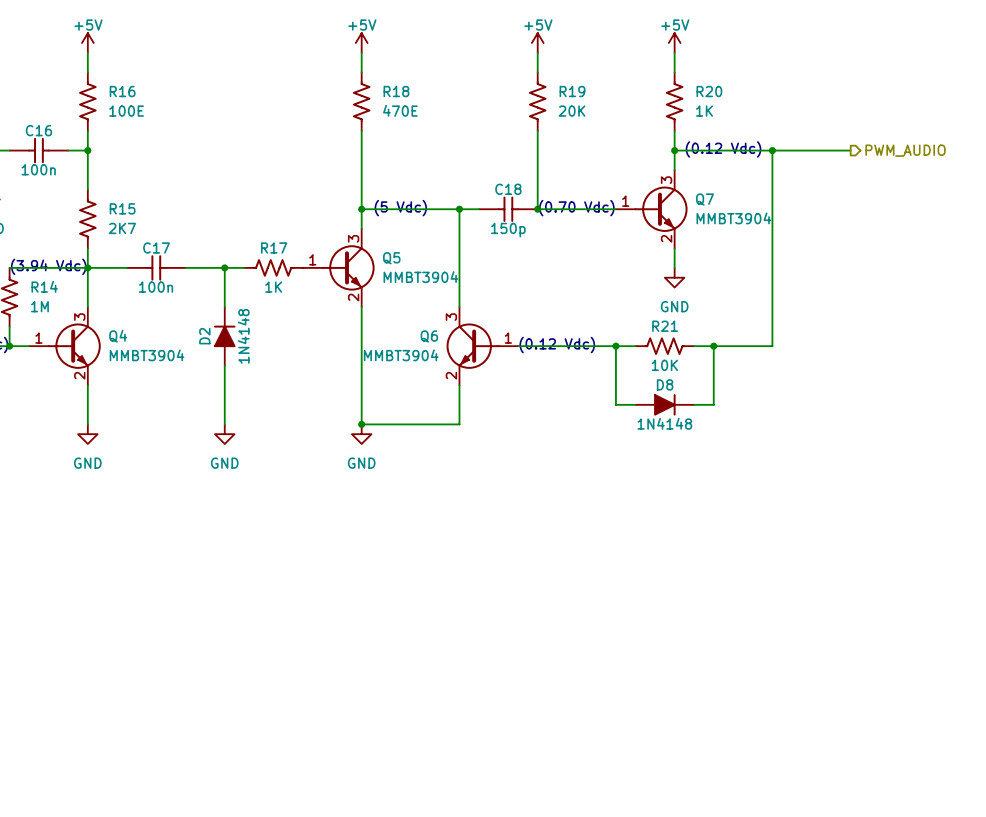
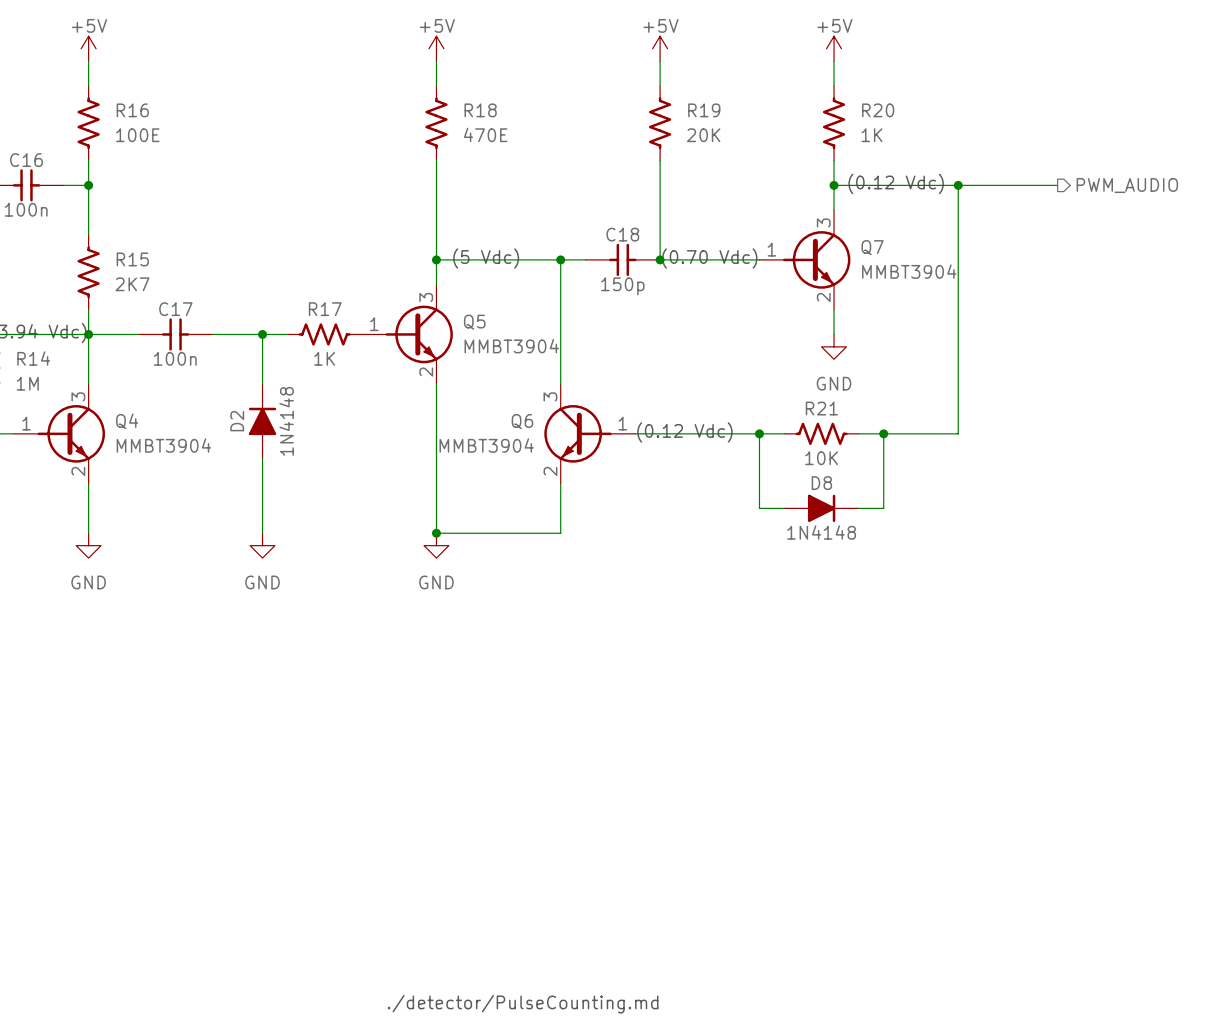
text: none -> ./detector/PulseCounting.md (523, 1004)

